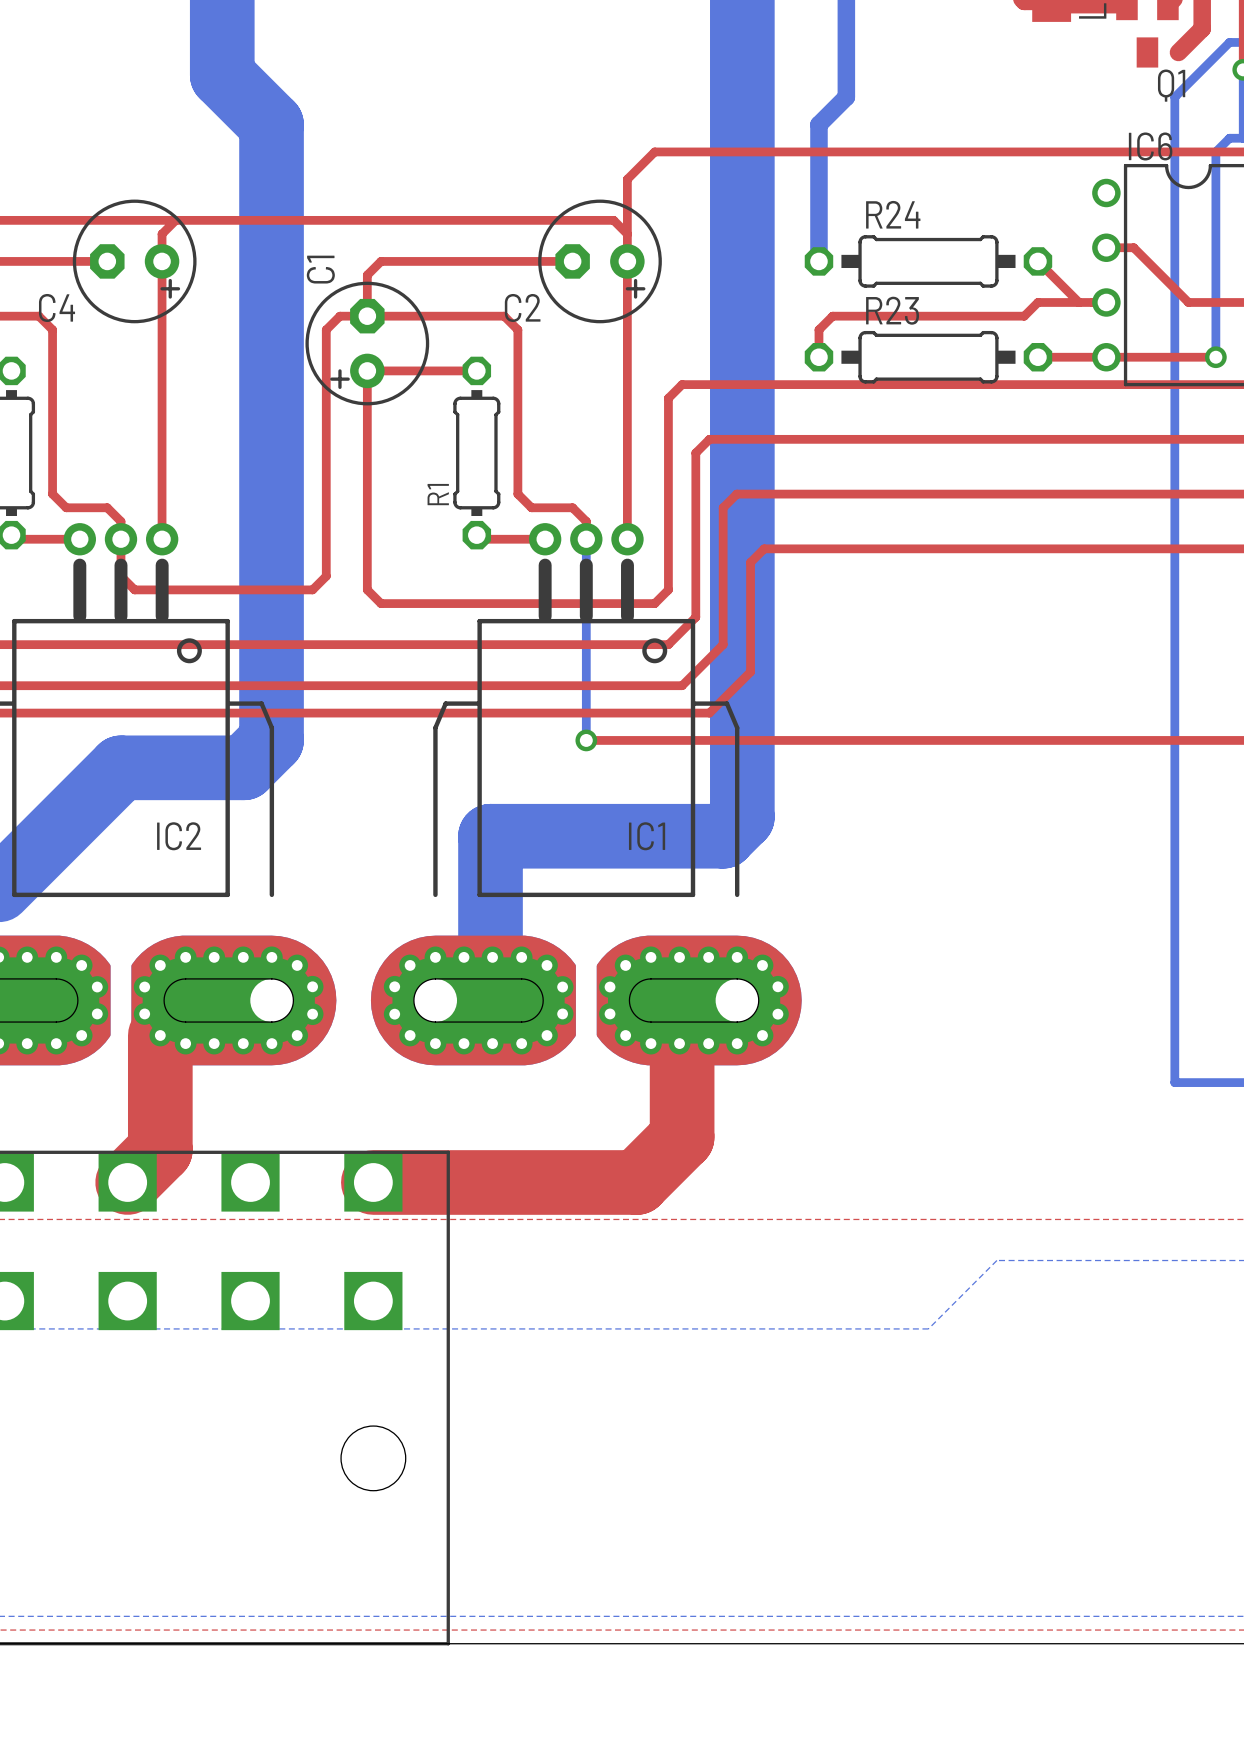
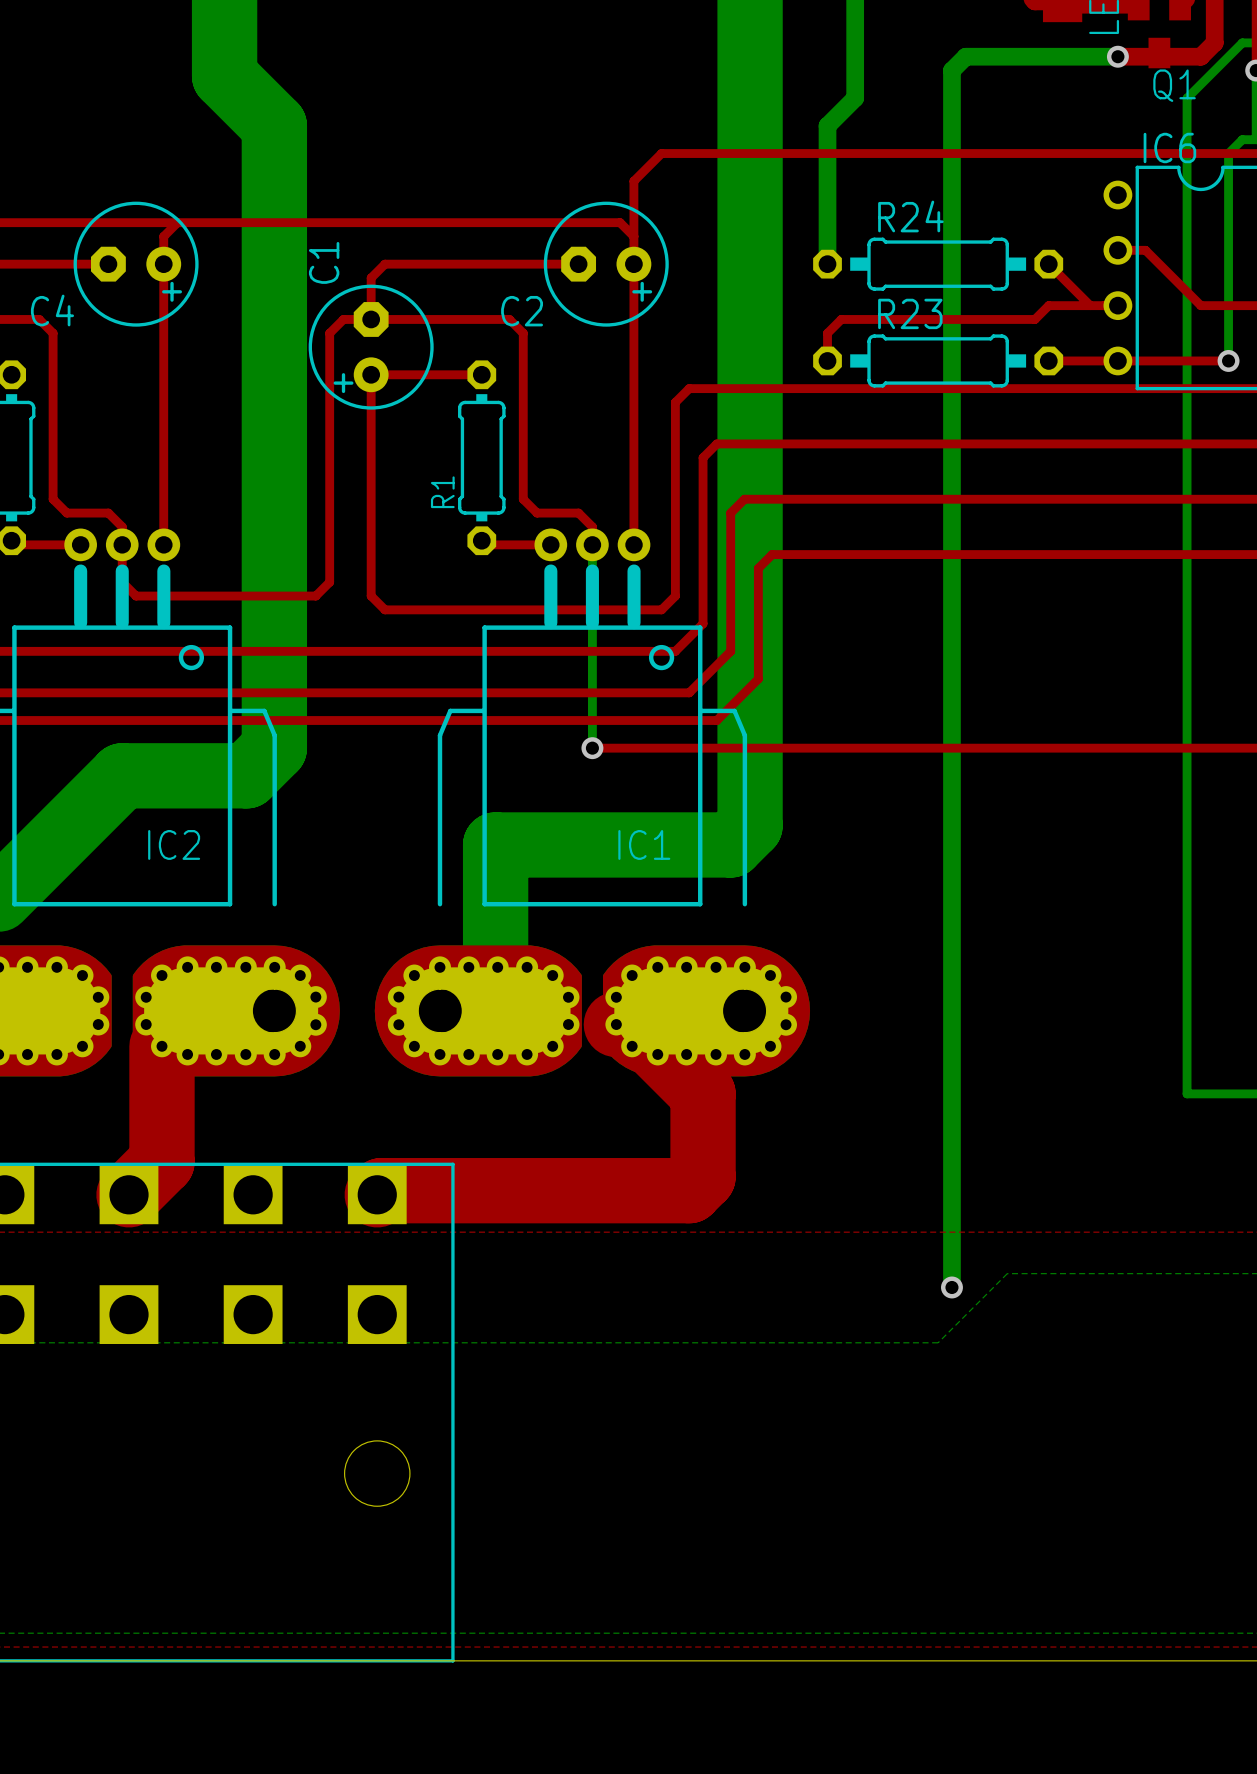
top track: (1202, 28) (1178, 52) -> (1214, 29) (1214, 42) (1200, 56) (1117, 56)
bottom track: none -> (1117, 56) (965, 56) (951, 70) (951, 1287)
via: none -> (1117, 56)
top track: (679, 1043) (682, 1046) (682, 1137) (636, 1182) (373, 1182) -> (616, 1024) (633, 1024) (703, 1093) (703, 1176) (689, 1190) (381, 1190) (377, 1194)
via: none -> (951, 1287)

